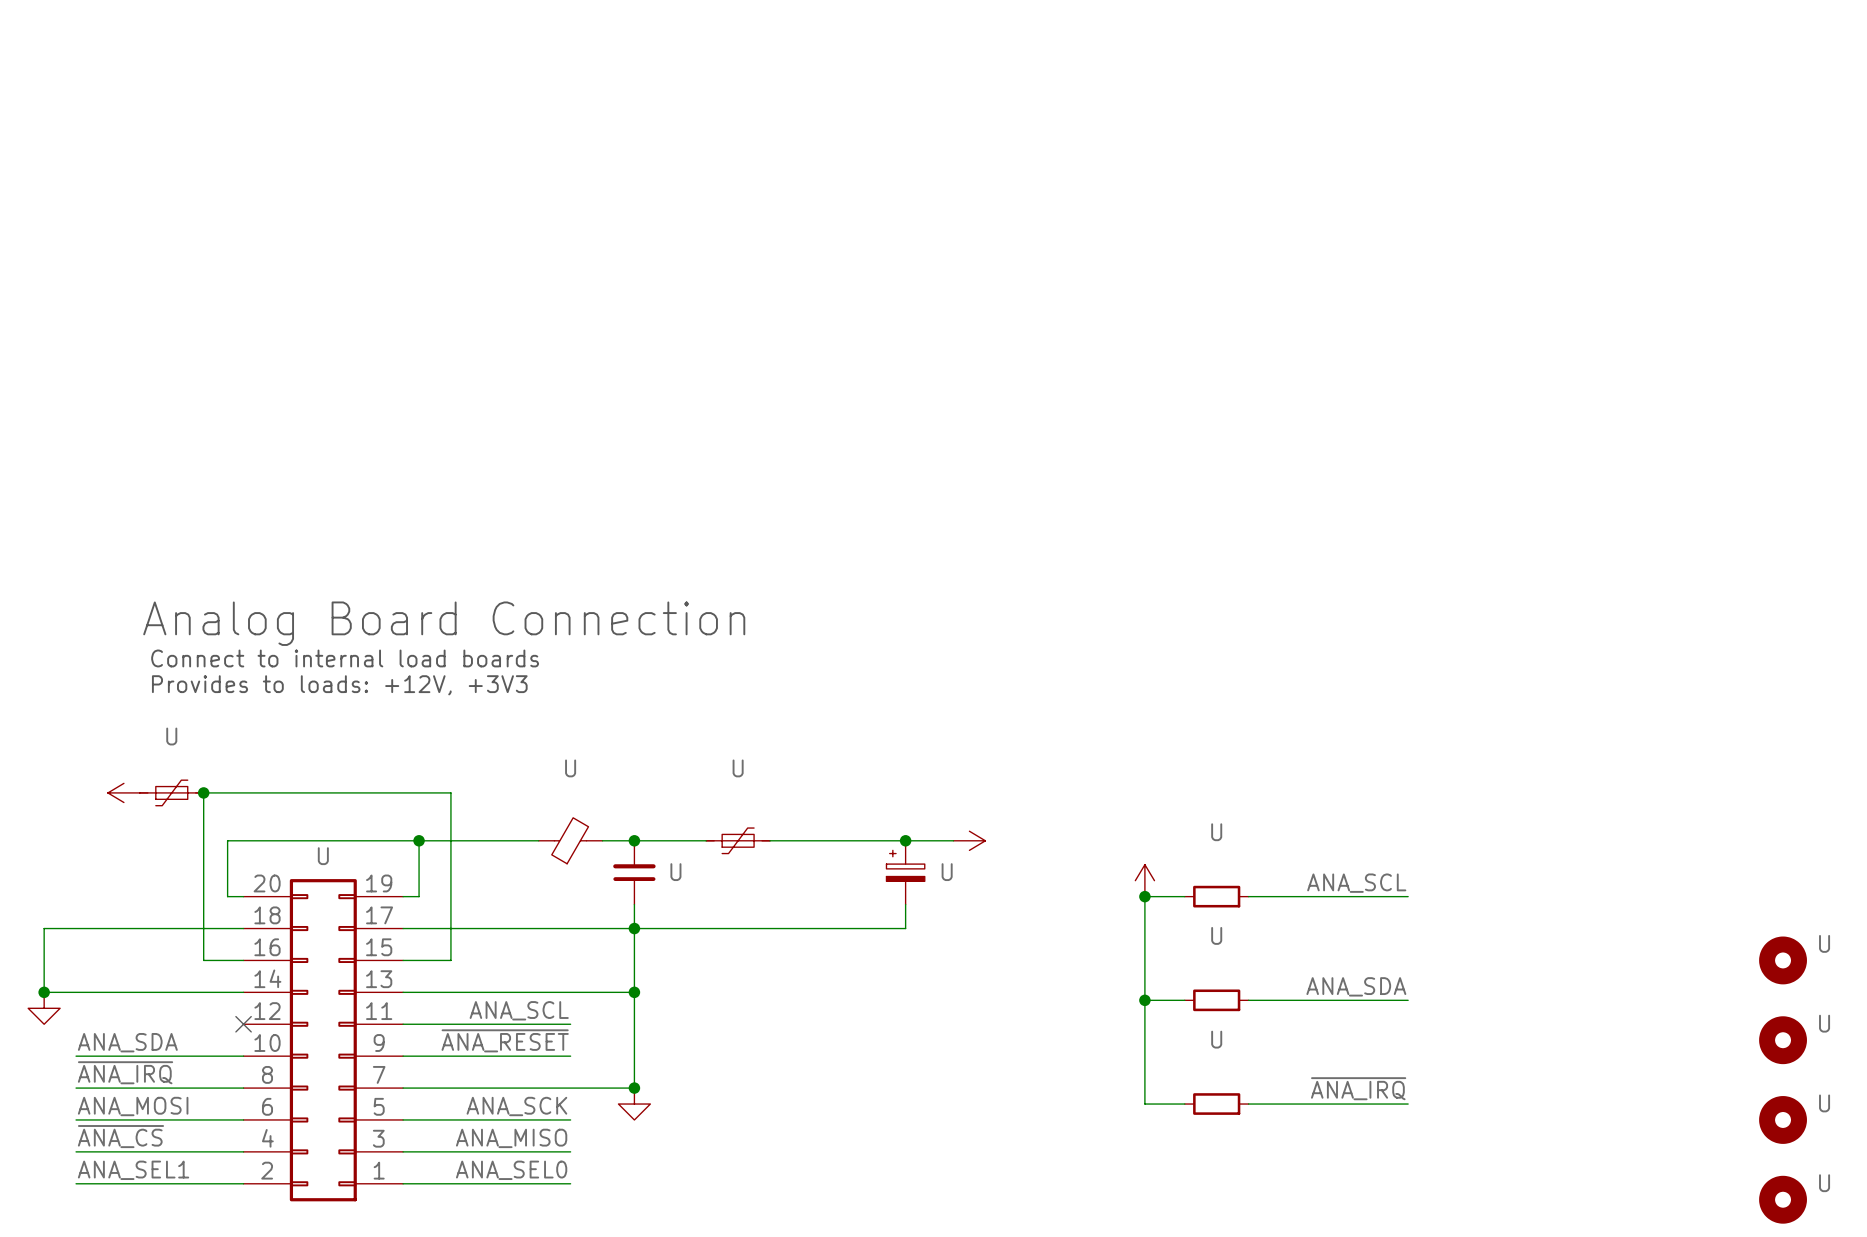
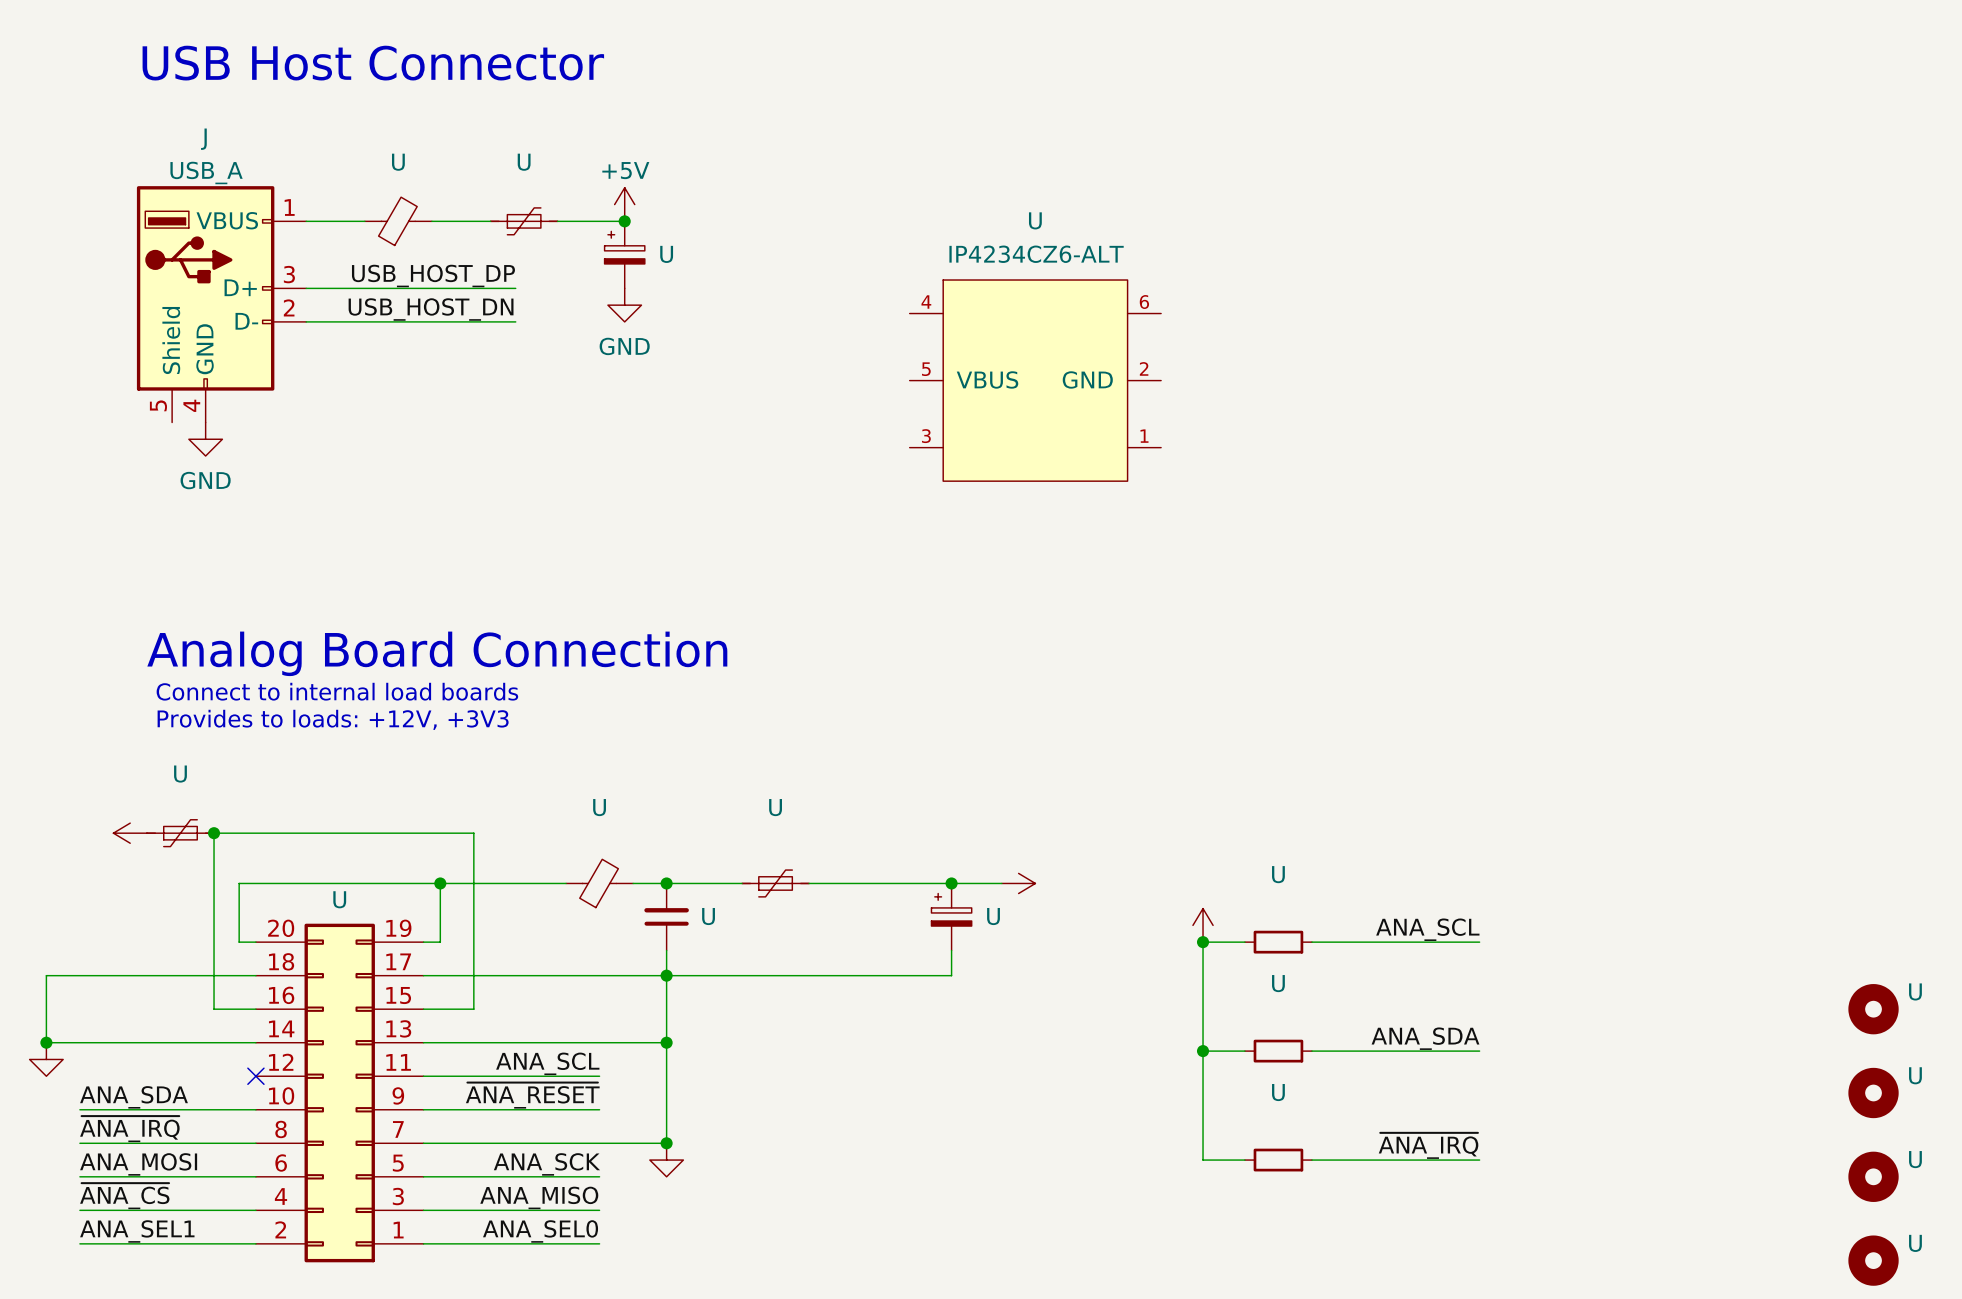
text: none -> USB Host Connector (373, 63)
power symbol: none -> +5V (624, 204)
wire: none -> (306, 221) (364, 221)
U: none -> (398, 221)
wire: none -> (431, 221) (490, 221)
U: none -> (524, 221)
wire: none -> (557, 221) (624, 221)
junction: none -> (624, 221)
U: none -> (624, 254)
label: none -> USB_HOST_DP (433, 275)
wire: none -> (306, 288) (515, 288)
J: none -> USB_A (221, 304)
power symbol: none -> GND (624, 305)
label: none -> USB_HOST_DN (431, 309)
wire: none -> (306, 321) (515, 321)
U: none -> IP4234CZ6-ALT (1035, 380)
power symbol: none -> GND (205, 439)

